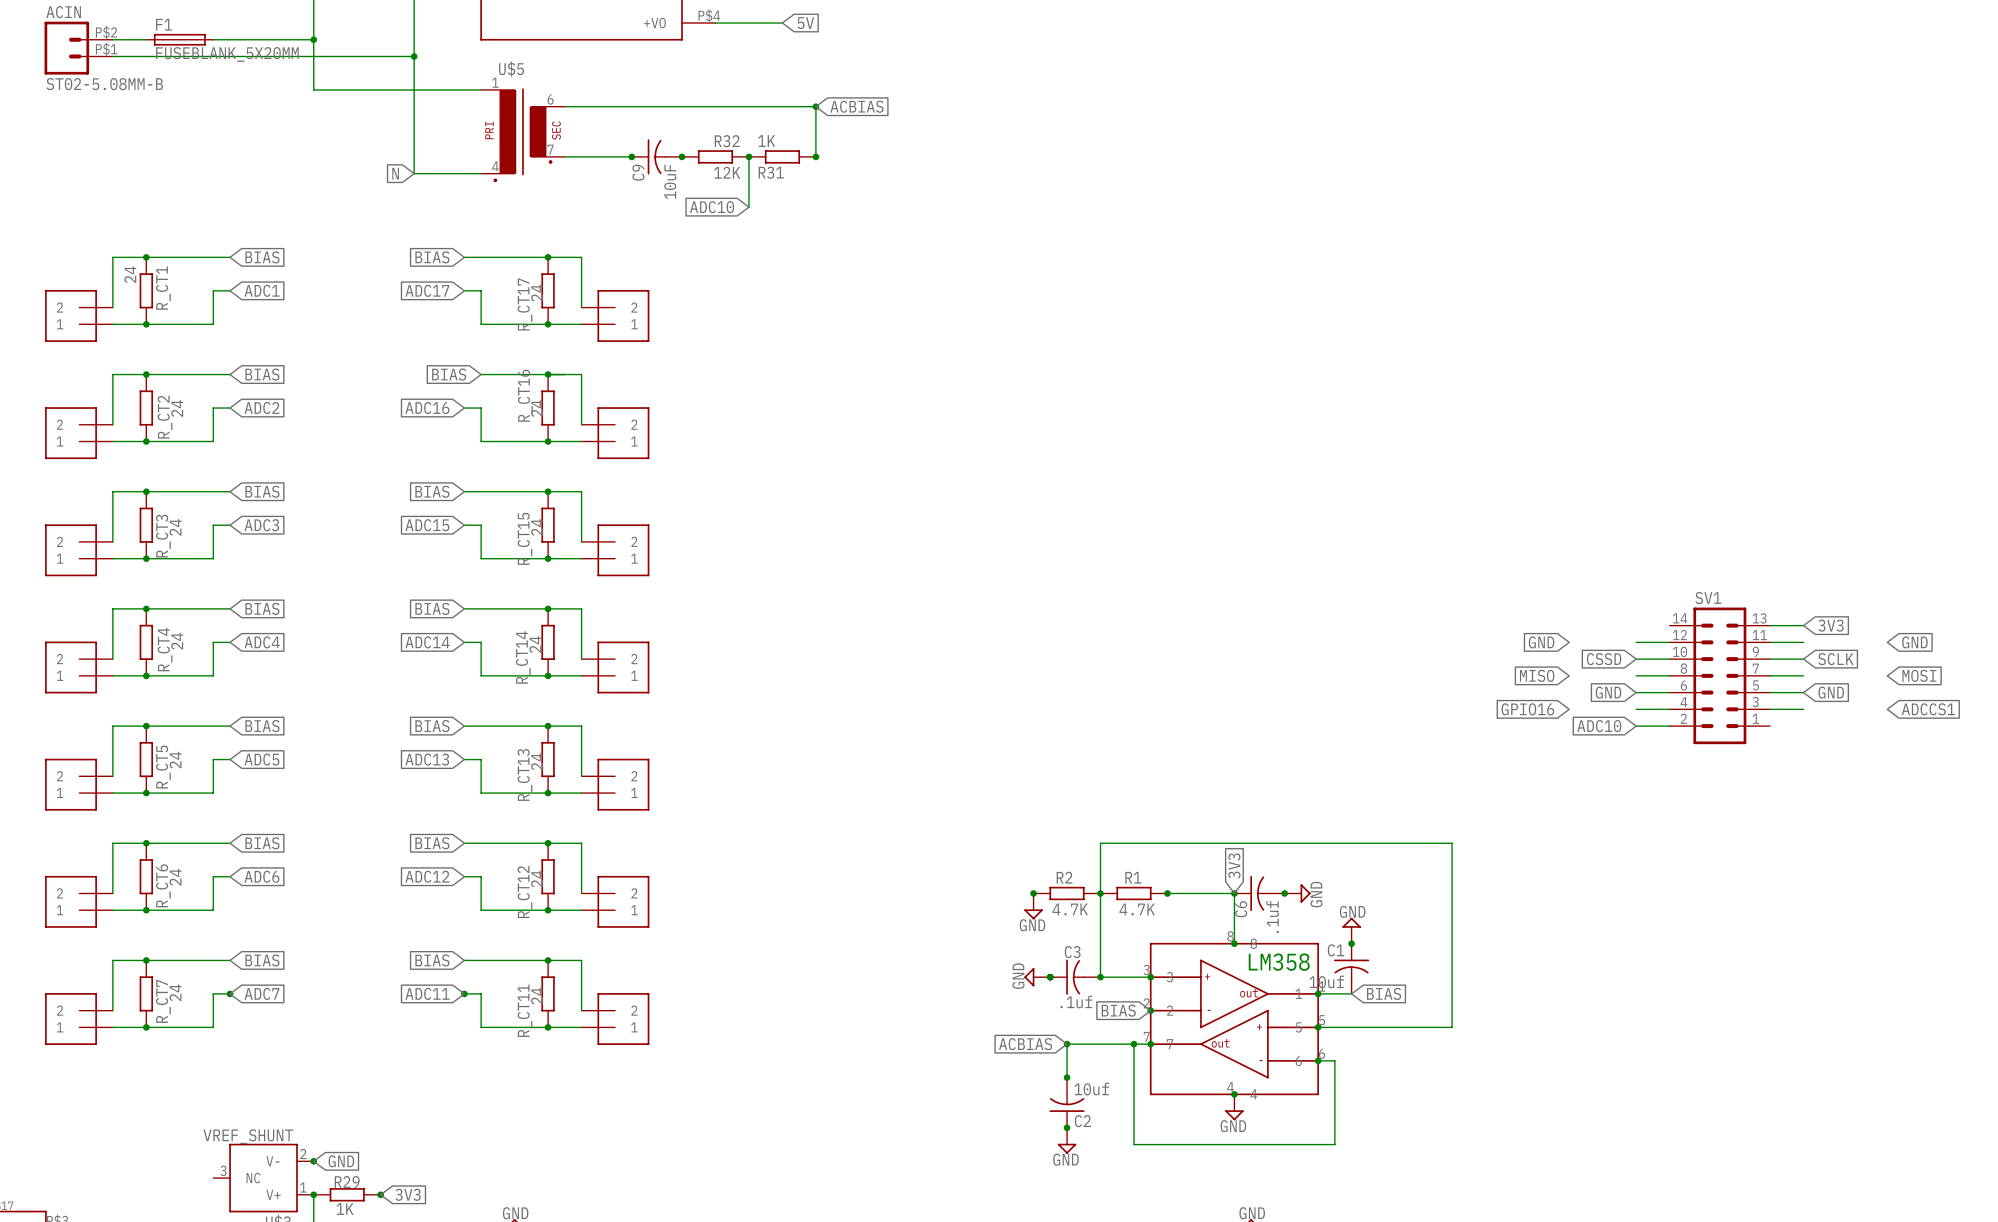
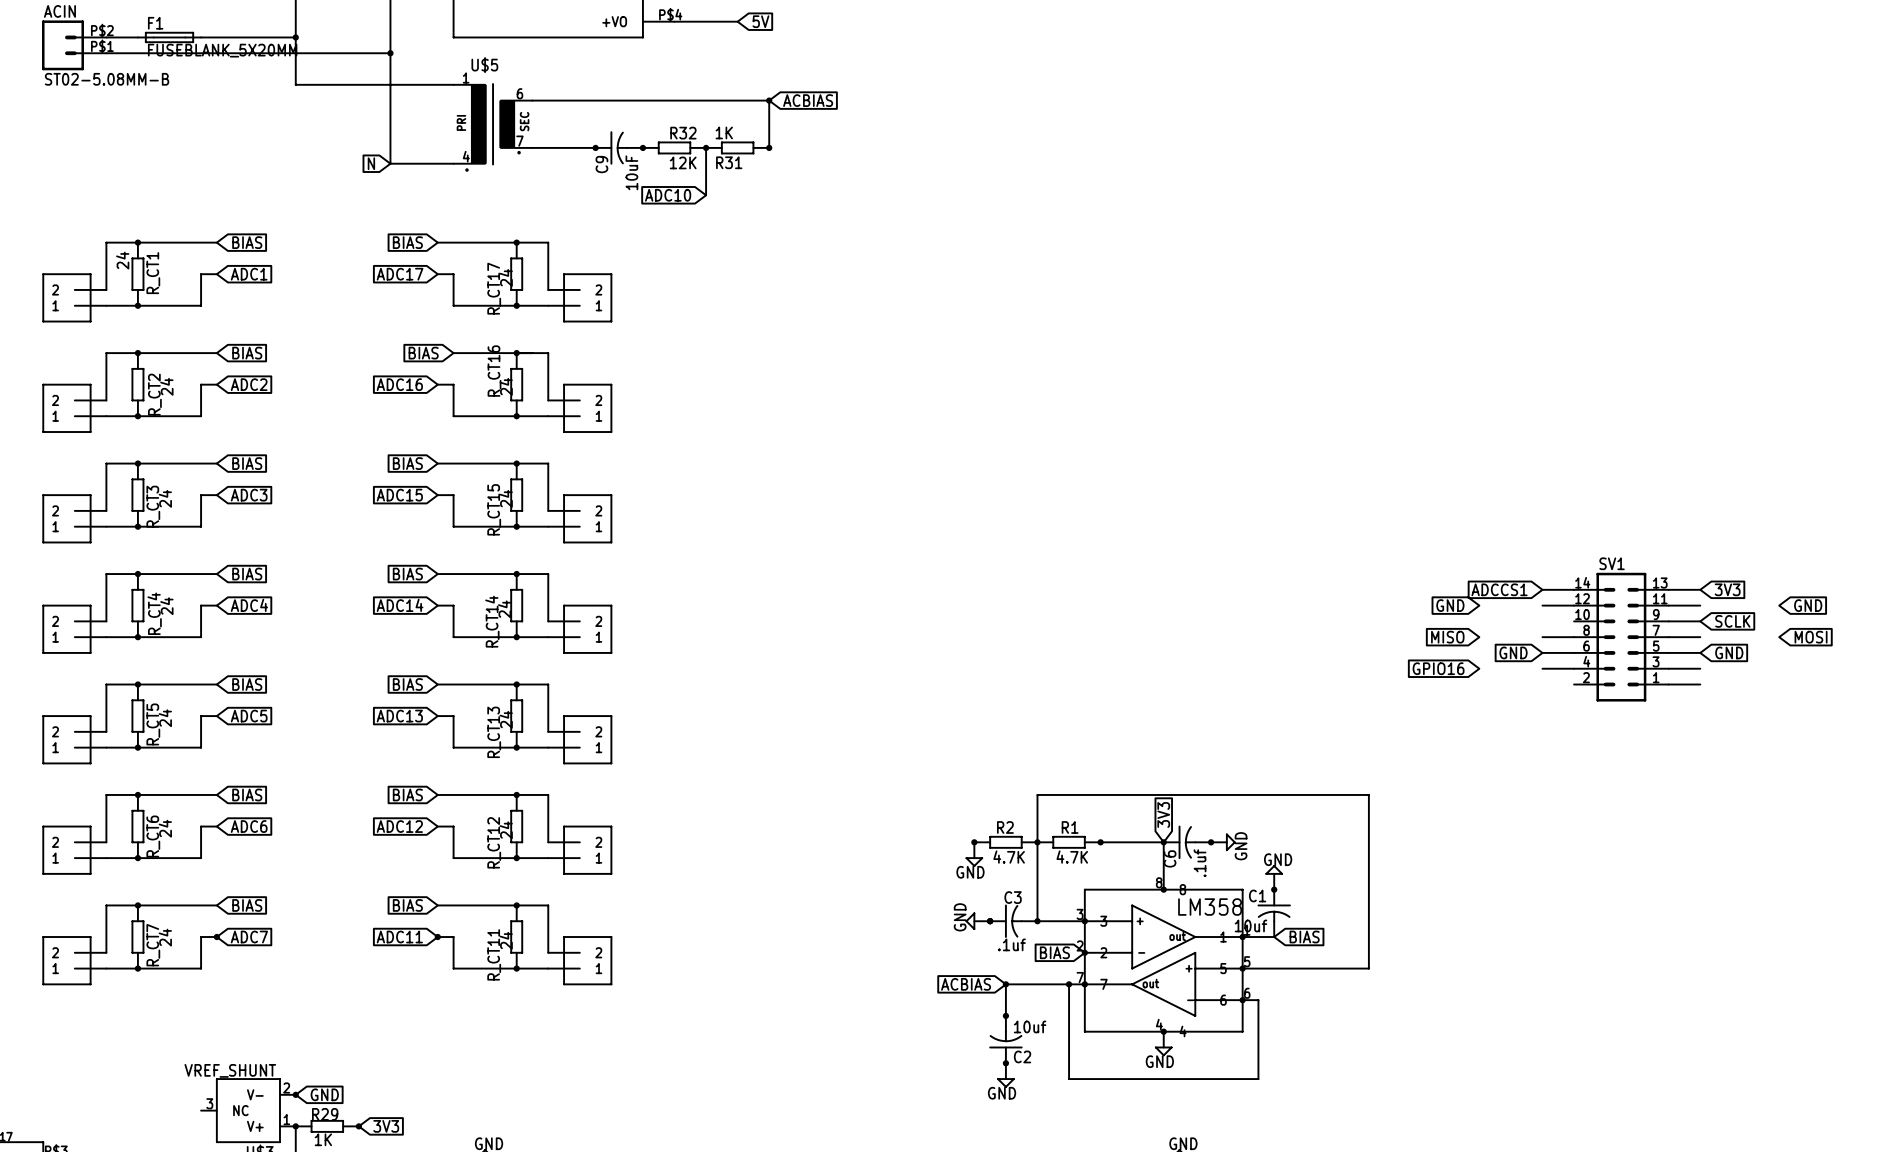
global label: none -> ADCCS1 (1499, 589)
global label: CSSD (1604, 659) -> none
wire: (1636, 659) (1669, 659) -> (1542, 589) (1574, 589)
global label: ADCCS1 (1928, 709) -> none
global label: ADC10 (1599, 726) -> none
wire: (1636, 726) (1669, 726) -> (1668, 684) (1700, 684)

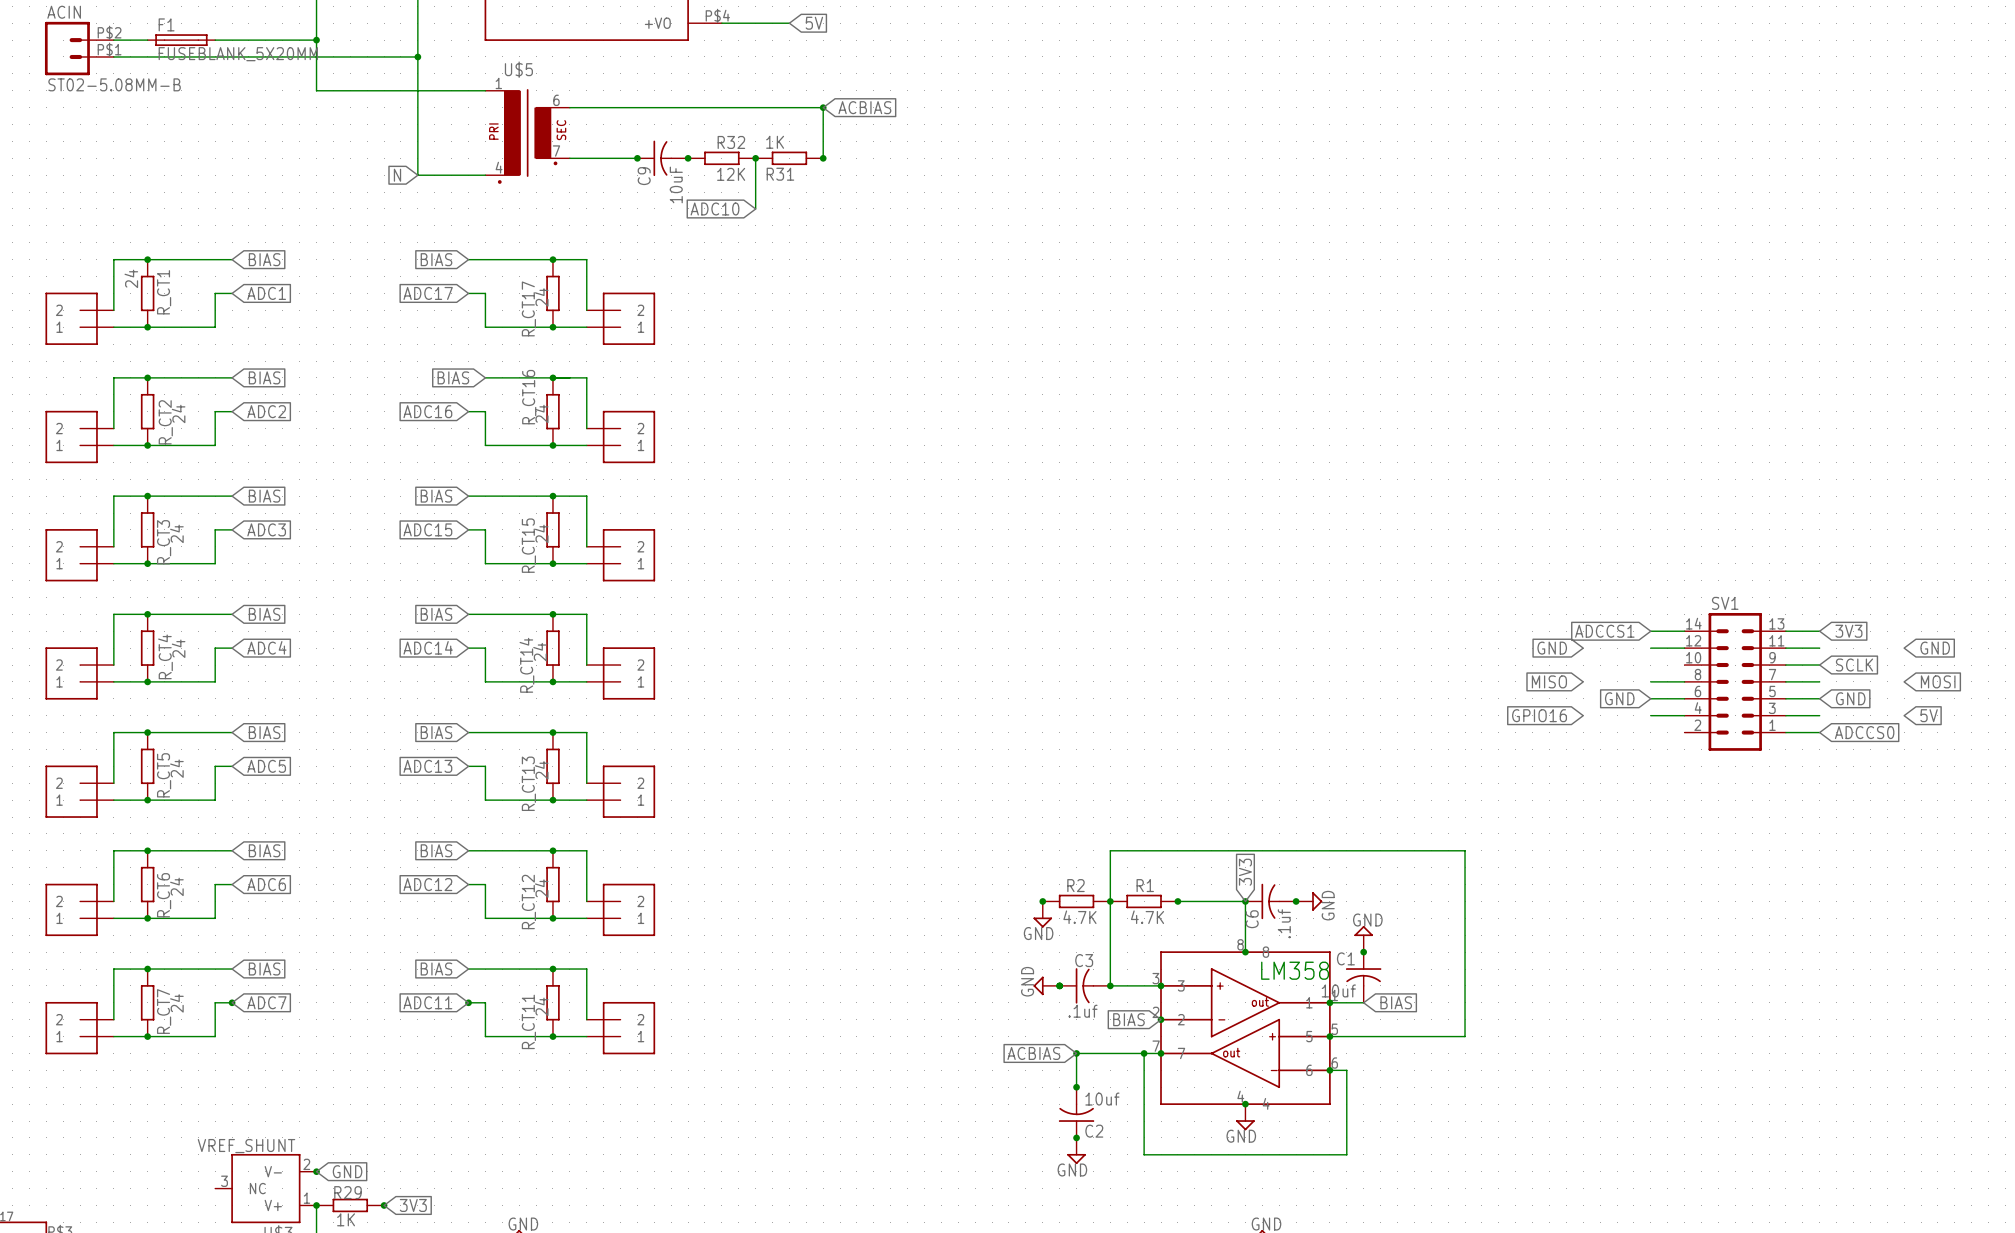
global label: none -> 5V (1929, 715)
global label: none -> ADCCS0 (1864, 732)

